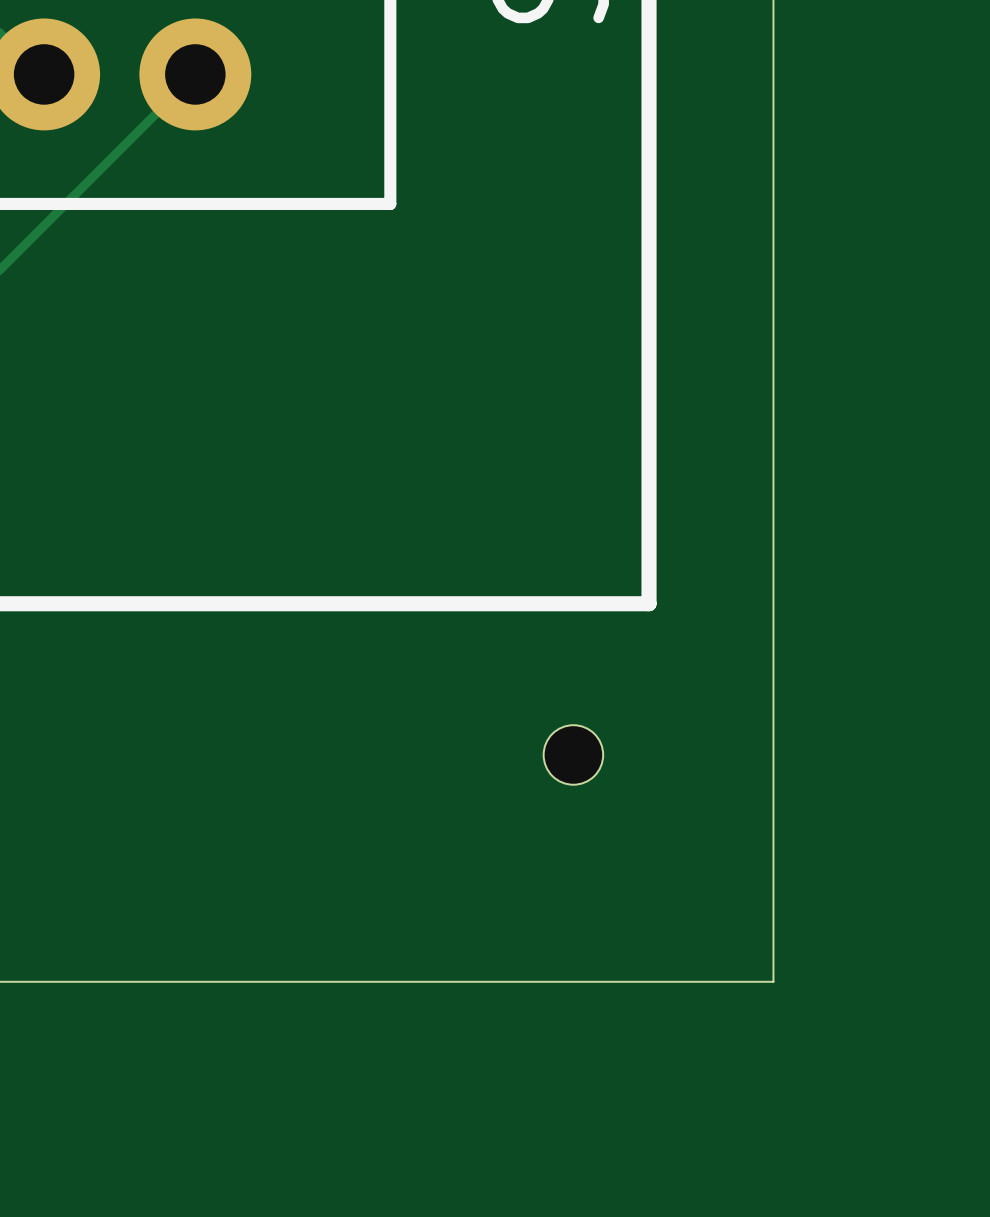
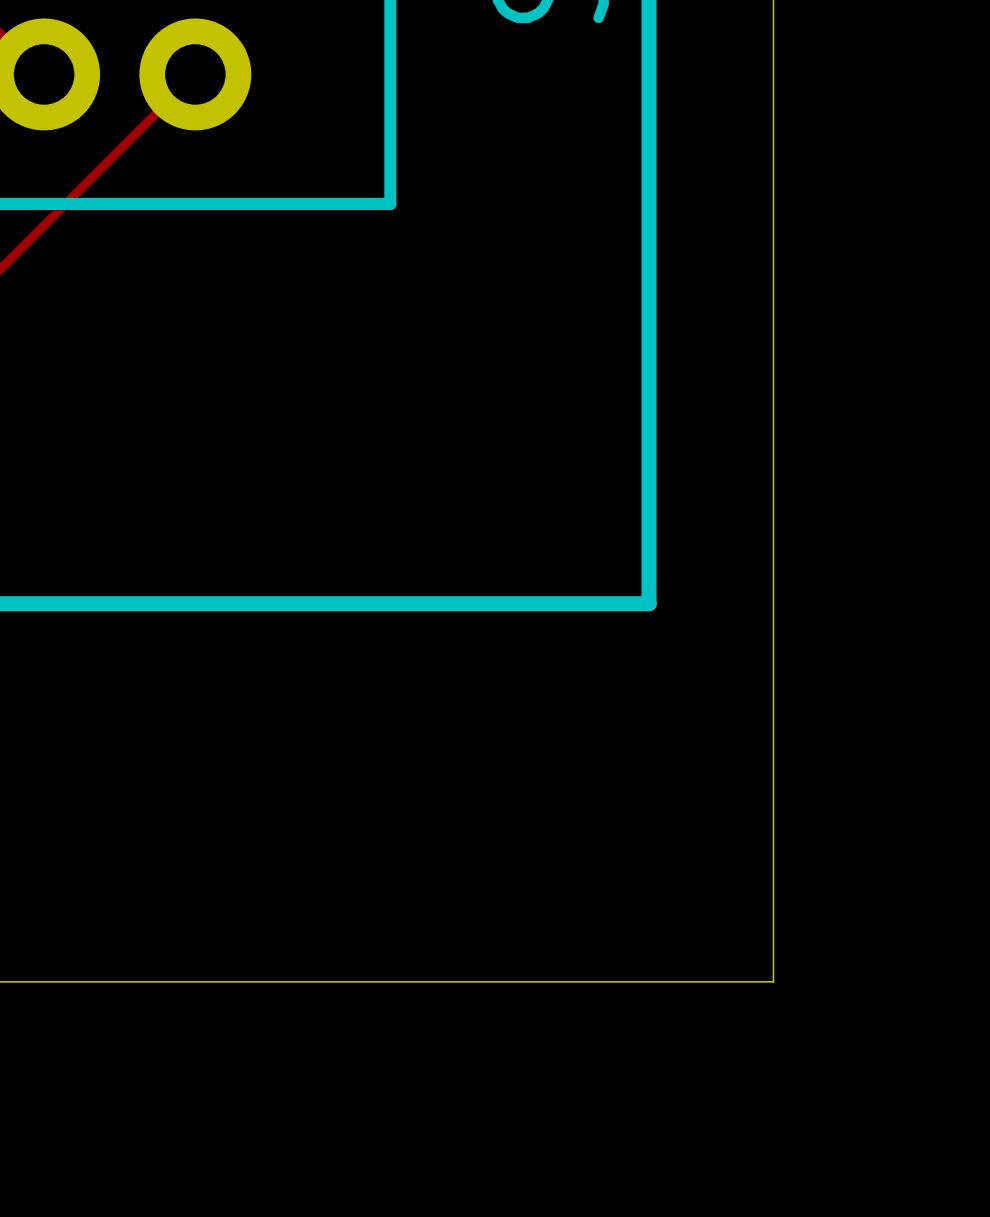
hole: (573, 754) -> none

